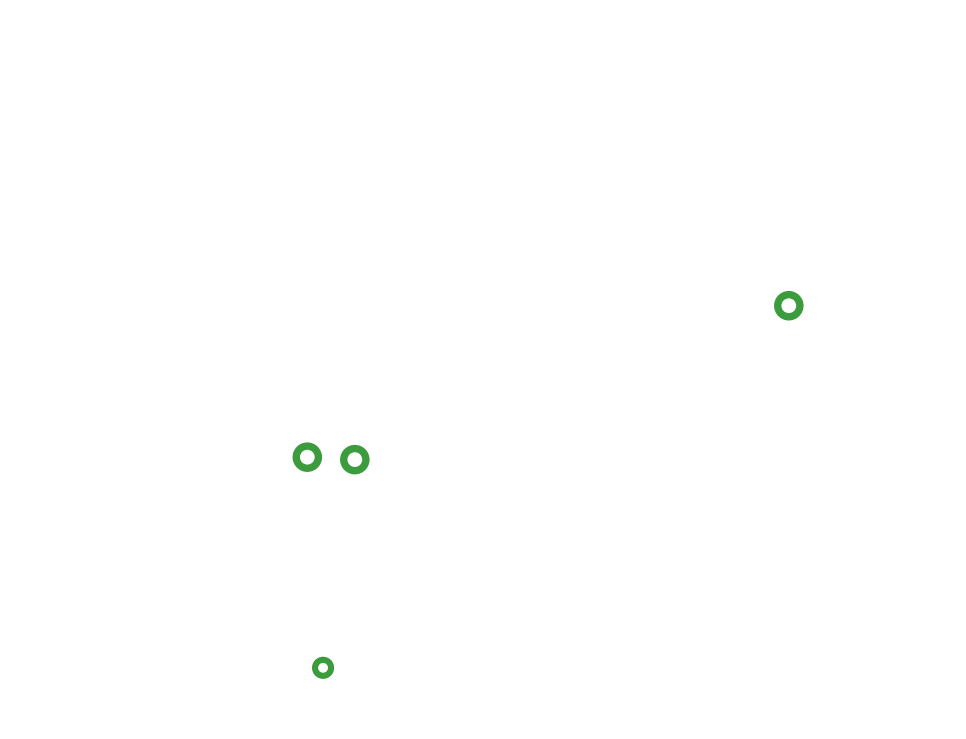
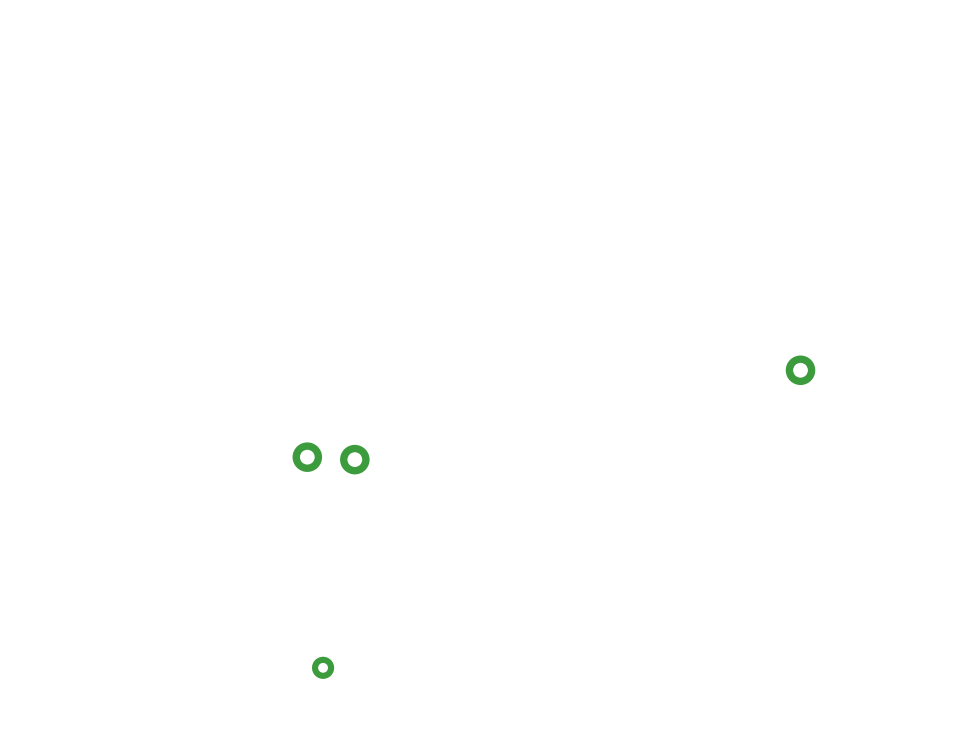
via position: (788, 305) -> (800, 370)

